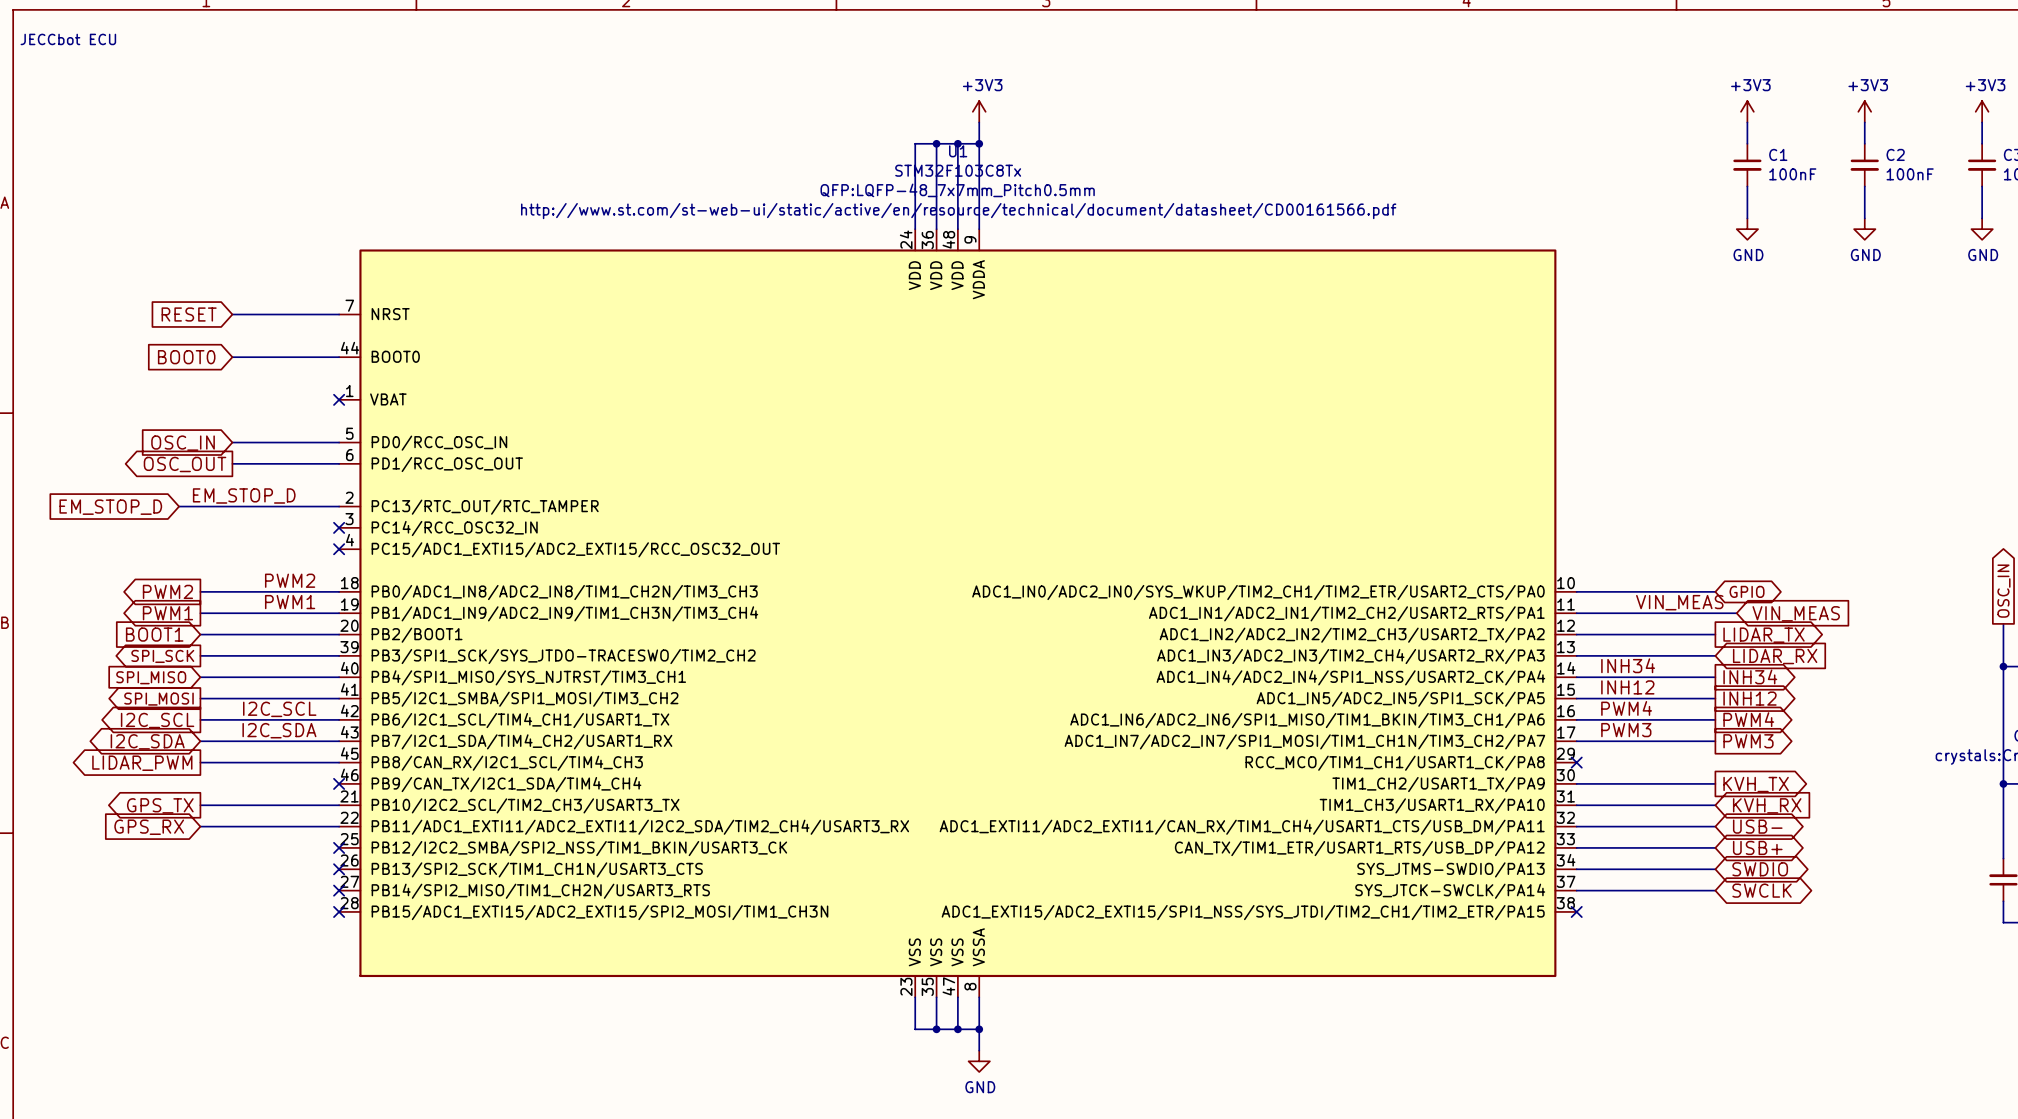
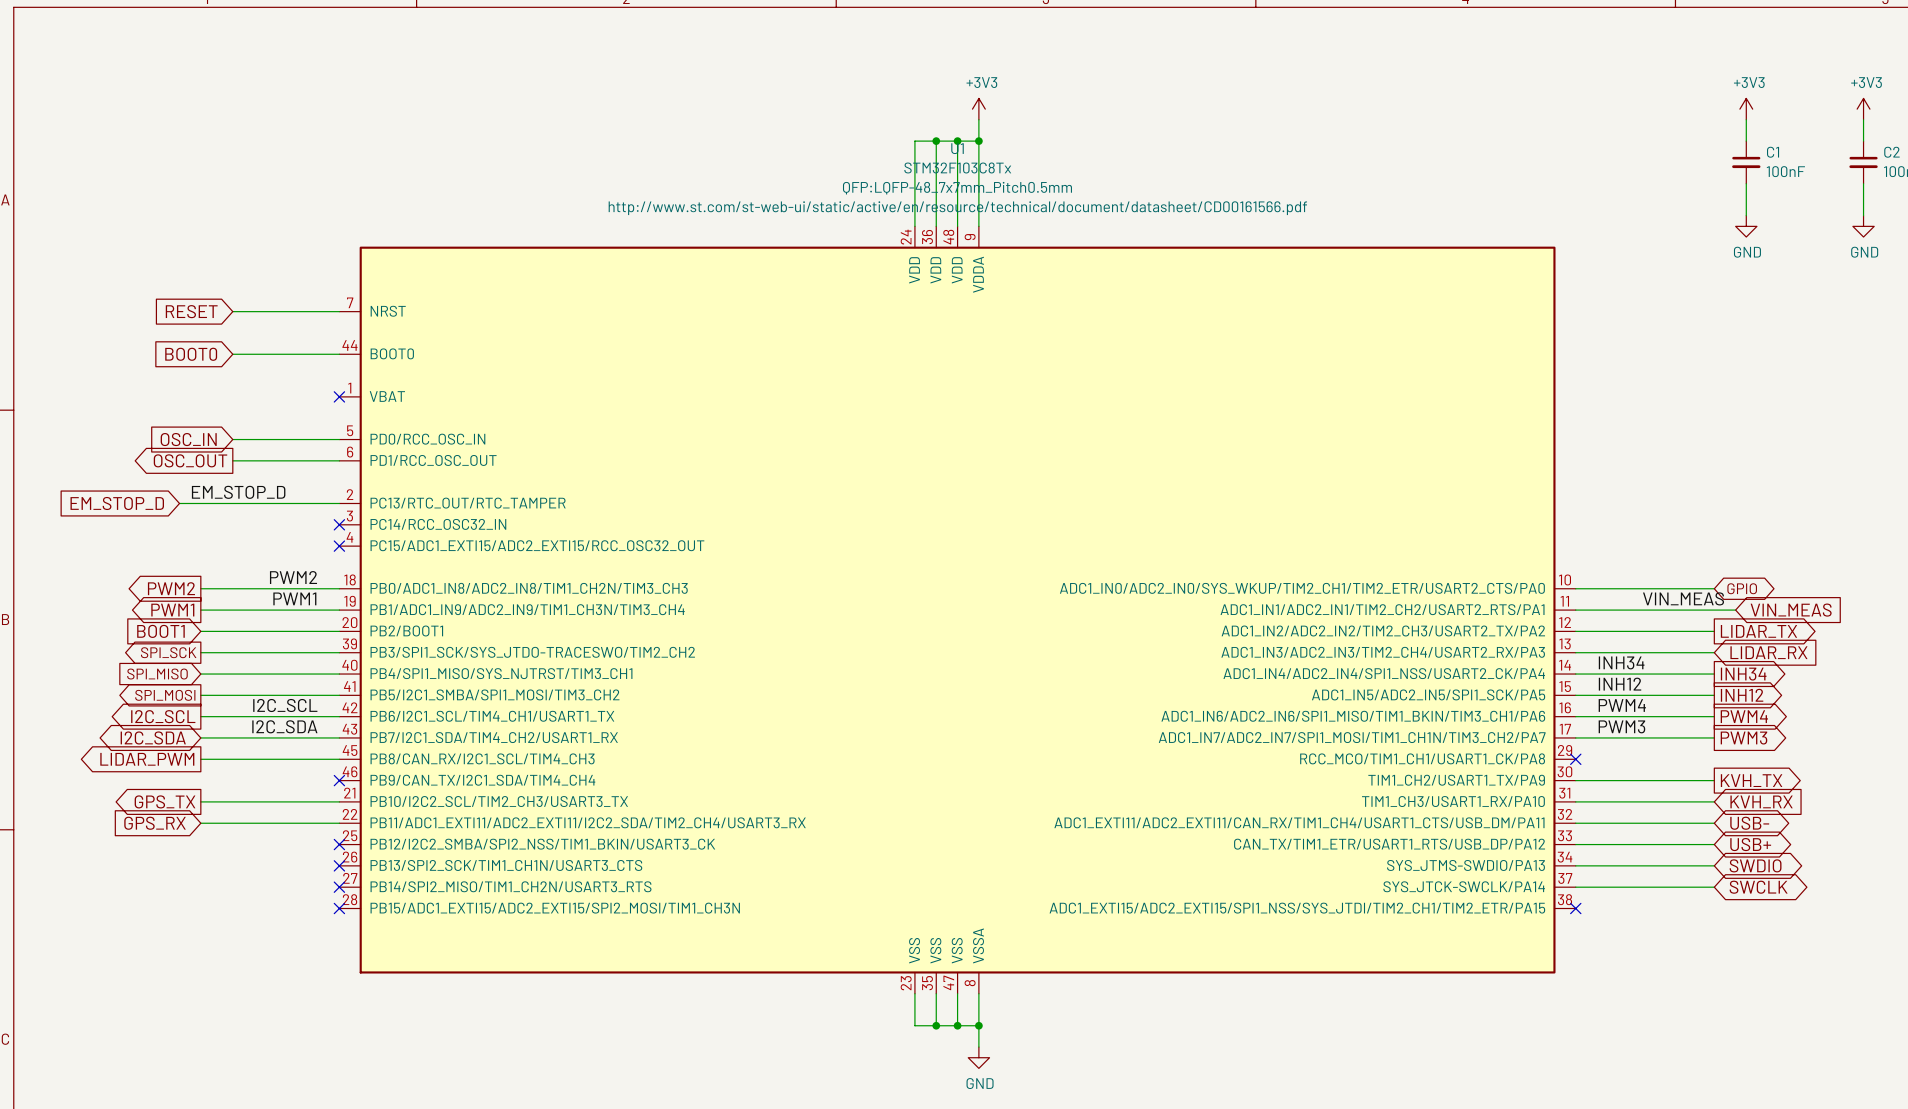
text: JECCbot ECU (68, 39) -> none

